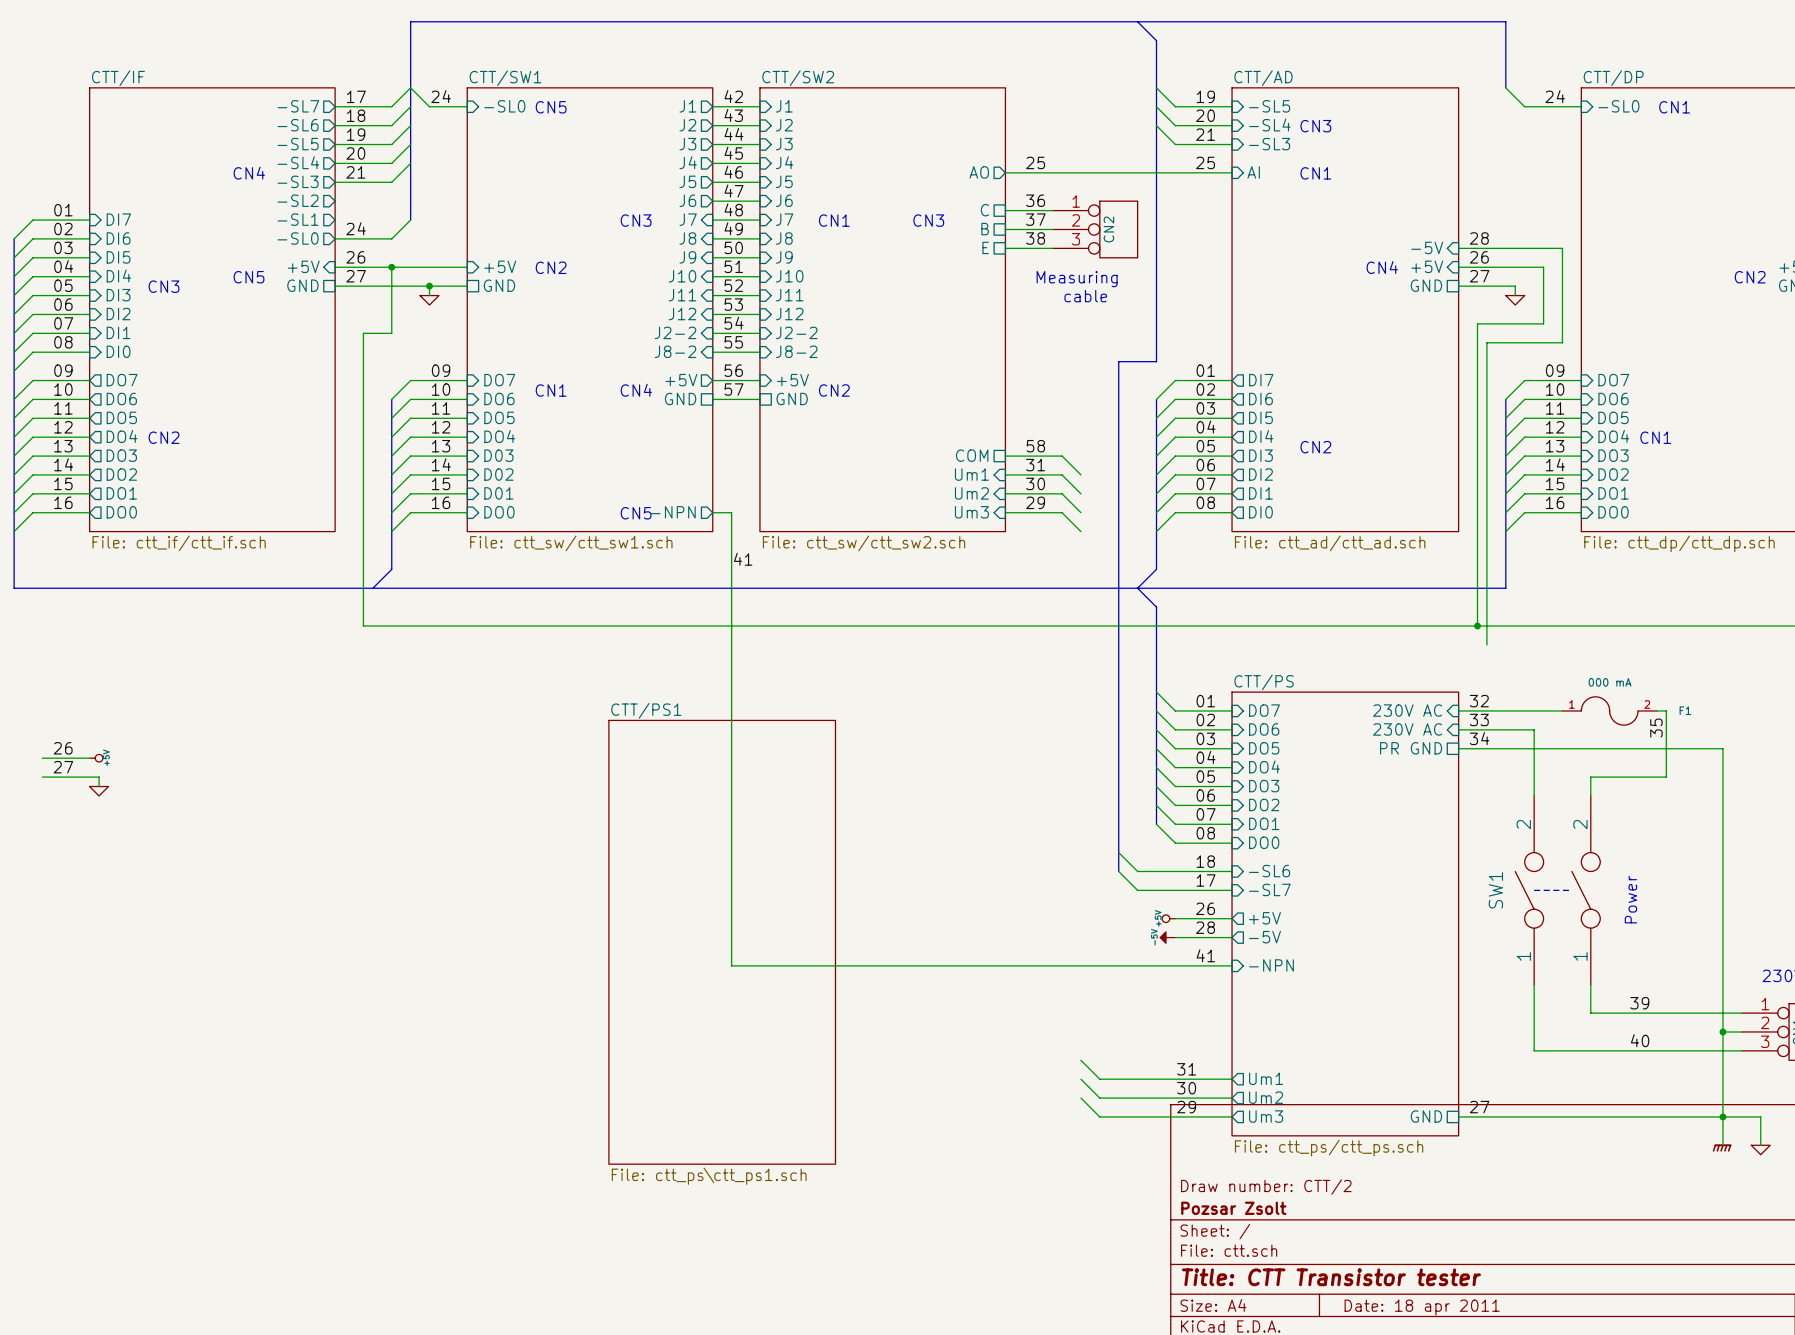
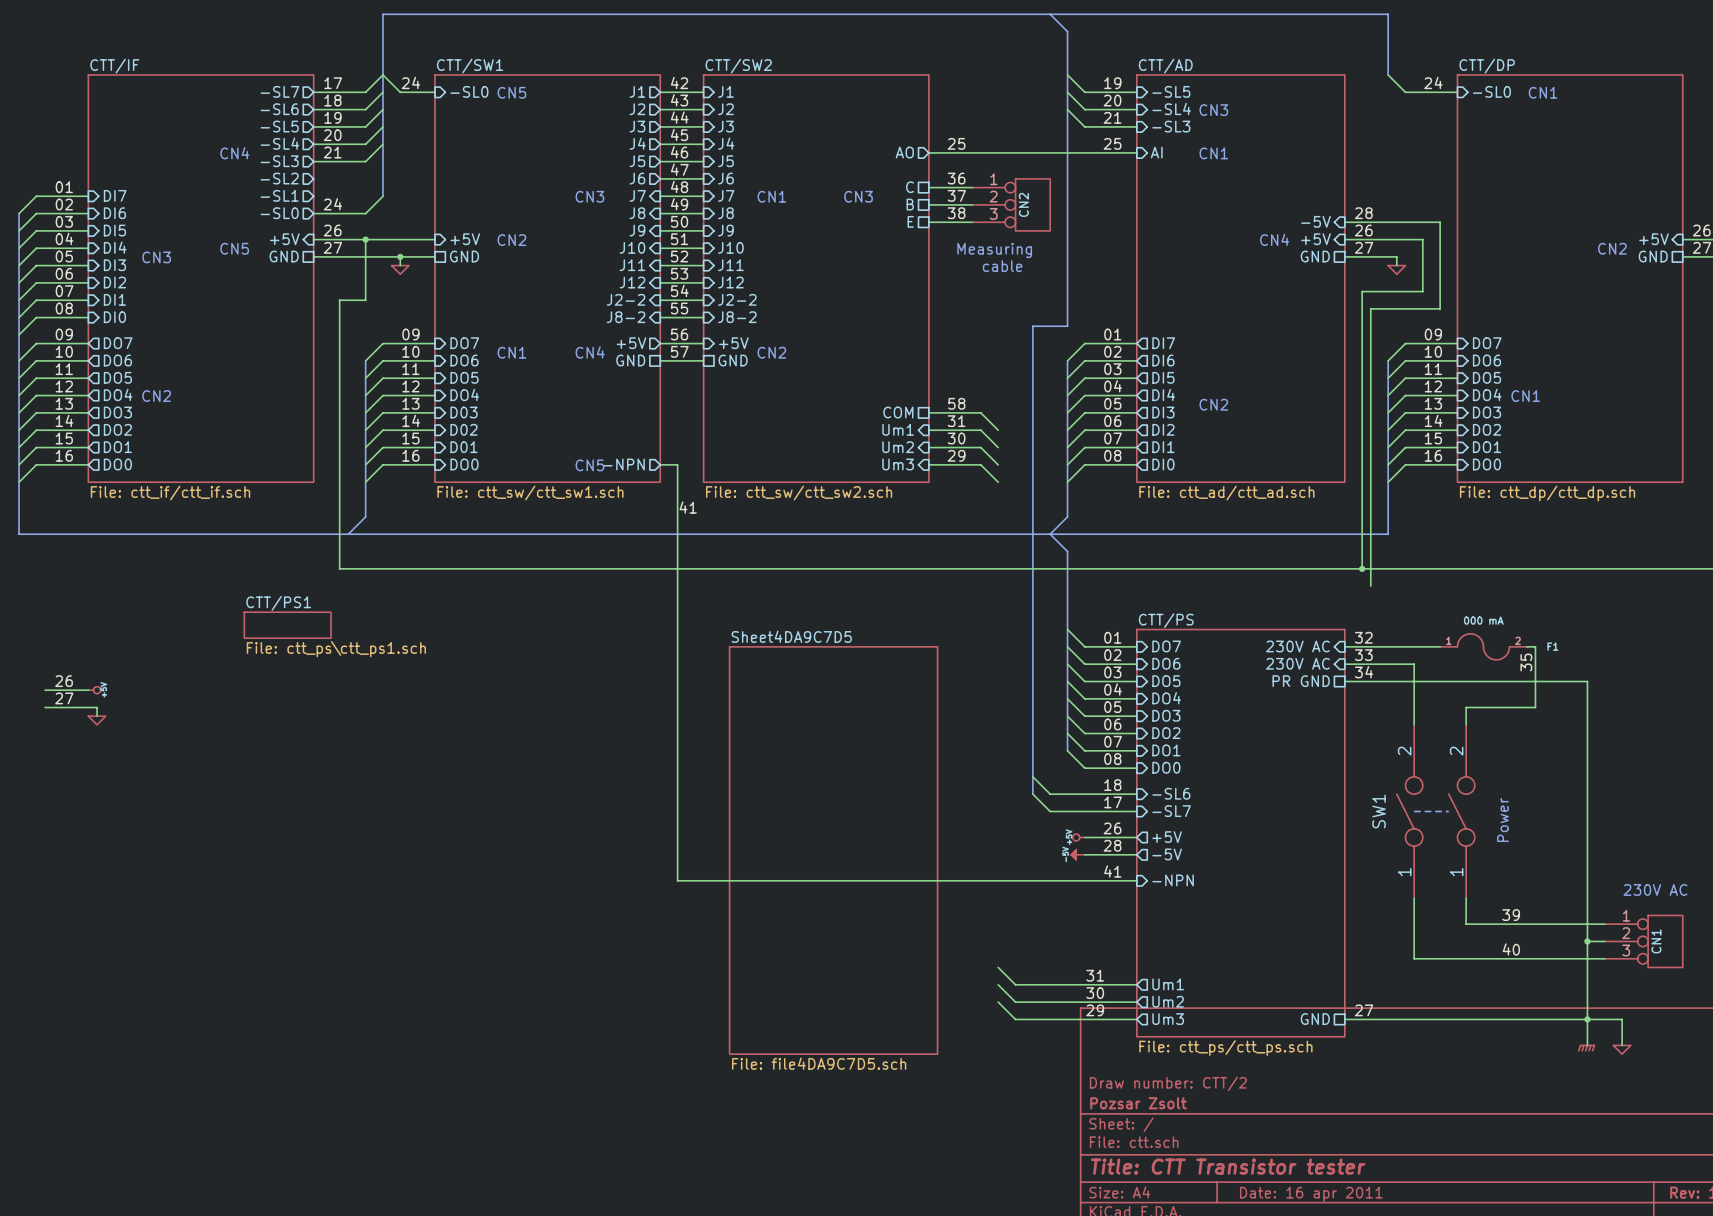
sheet CTT/PS1 name position: CTT/PS1 (646, 710) -> CTT/PS1 (278, 603)
sheet CTT/PS1 shape: [608, 720, 836, 1165] -> [244, 612, 331, 639]
sheet Sheet4DA9C7D5: none -> File: file4DA9C7D5.sch (833, 850)
sheet CTT/PS1 value position: File: ctt_ps\ctt_ps1.sch (709, 1176) -> File: ctt_ps\ctt_ps1.sch (336, 649)
title block: Date: 18 apr 2011 (1422, 1307) -> Date: 16 apr 2011 (1311, 1194)

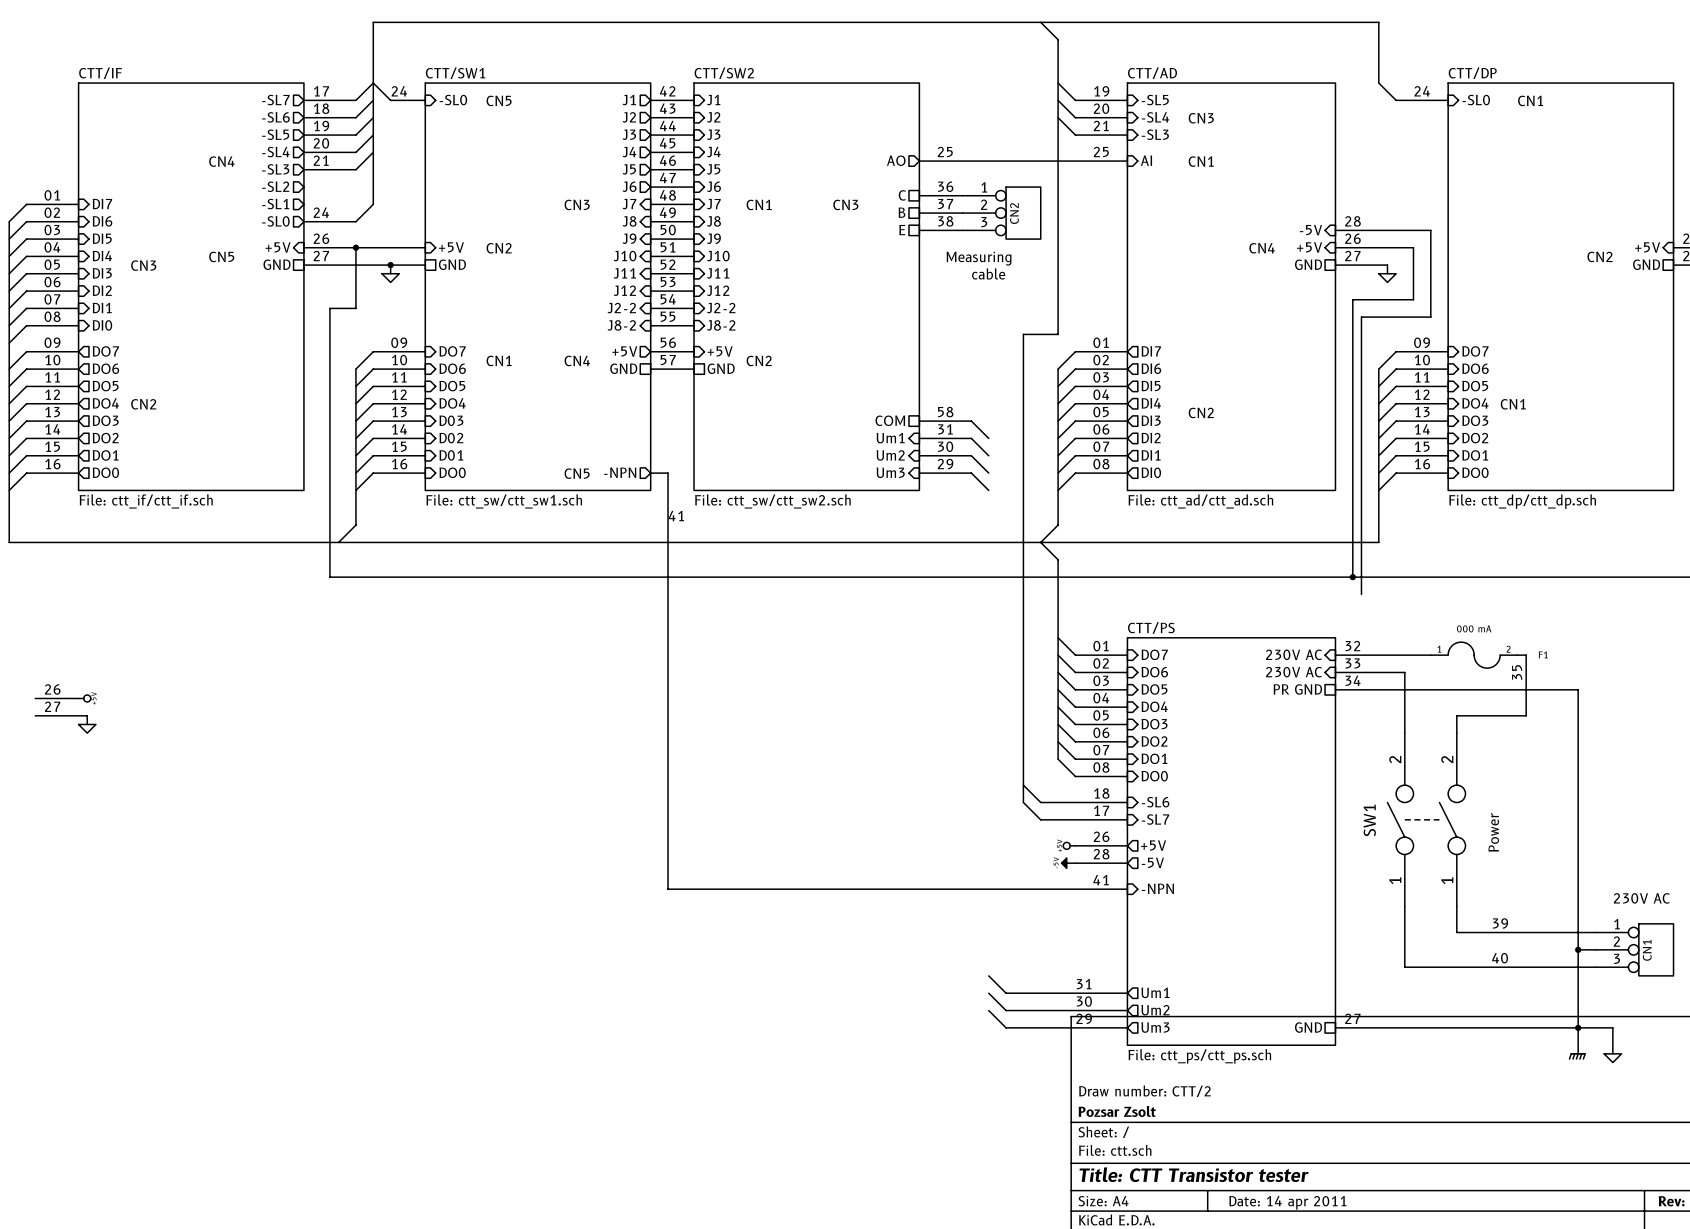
sheet CTT/PS1: File: ctt_ps\ctt_ps1.sch (287, 625) -> none
sheet Sheet4DA9C7D5: File: file4DA9C7D5.sch (833, 850) -> none
title block: Date: 16 apr 2011 (1311, 1194) -> Date: 14 apr 2011 (1287, 1202)

